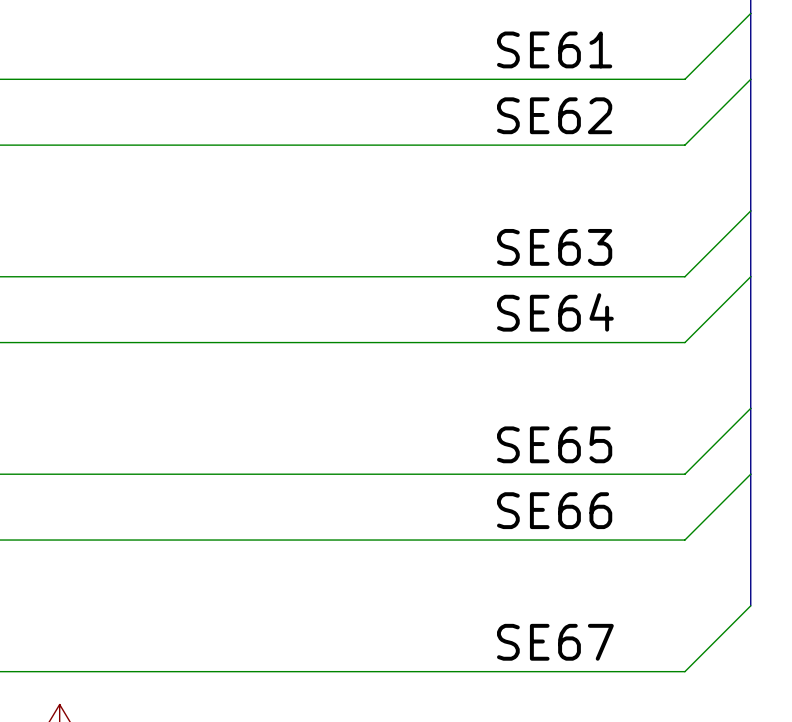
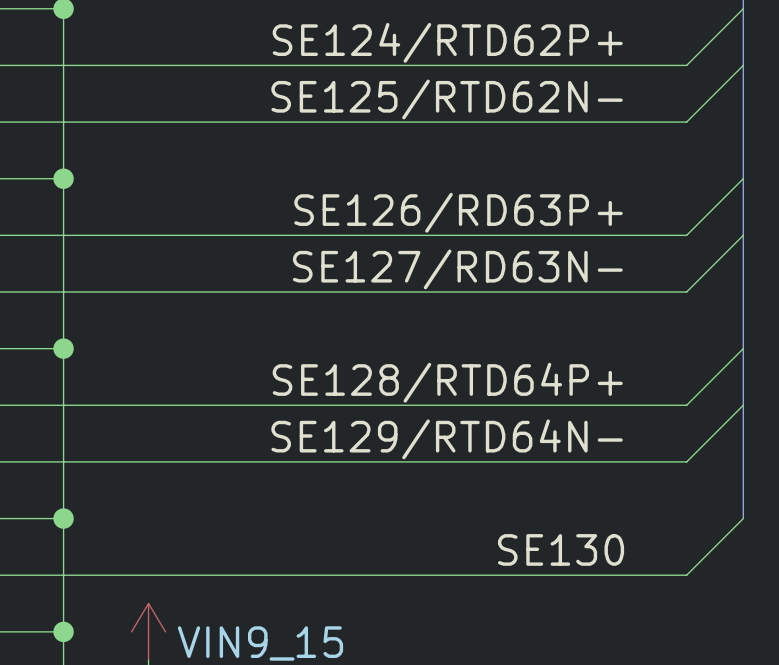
label: SE61 (554, 49) -> SE124/RTD62P+ (447, 42)
label: SE62 (554, 115) -> SE125/RTD62N- (447, 99)
label: SE63 (554, 247) -> SE126/RD63P+ (458, 212)
label: SE64 (555, 312) -> SE127/RD63N- (457, 269)
label: SE65 (554, 444) -> SE128/RTD64P+ (447, 382)
label: SE66 (554, 510) -> SE129/RTD64N- (447, 439)
label: SE67 (555, 642) -> SE130 (561, 549)

